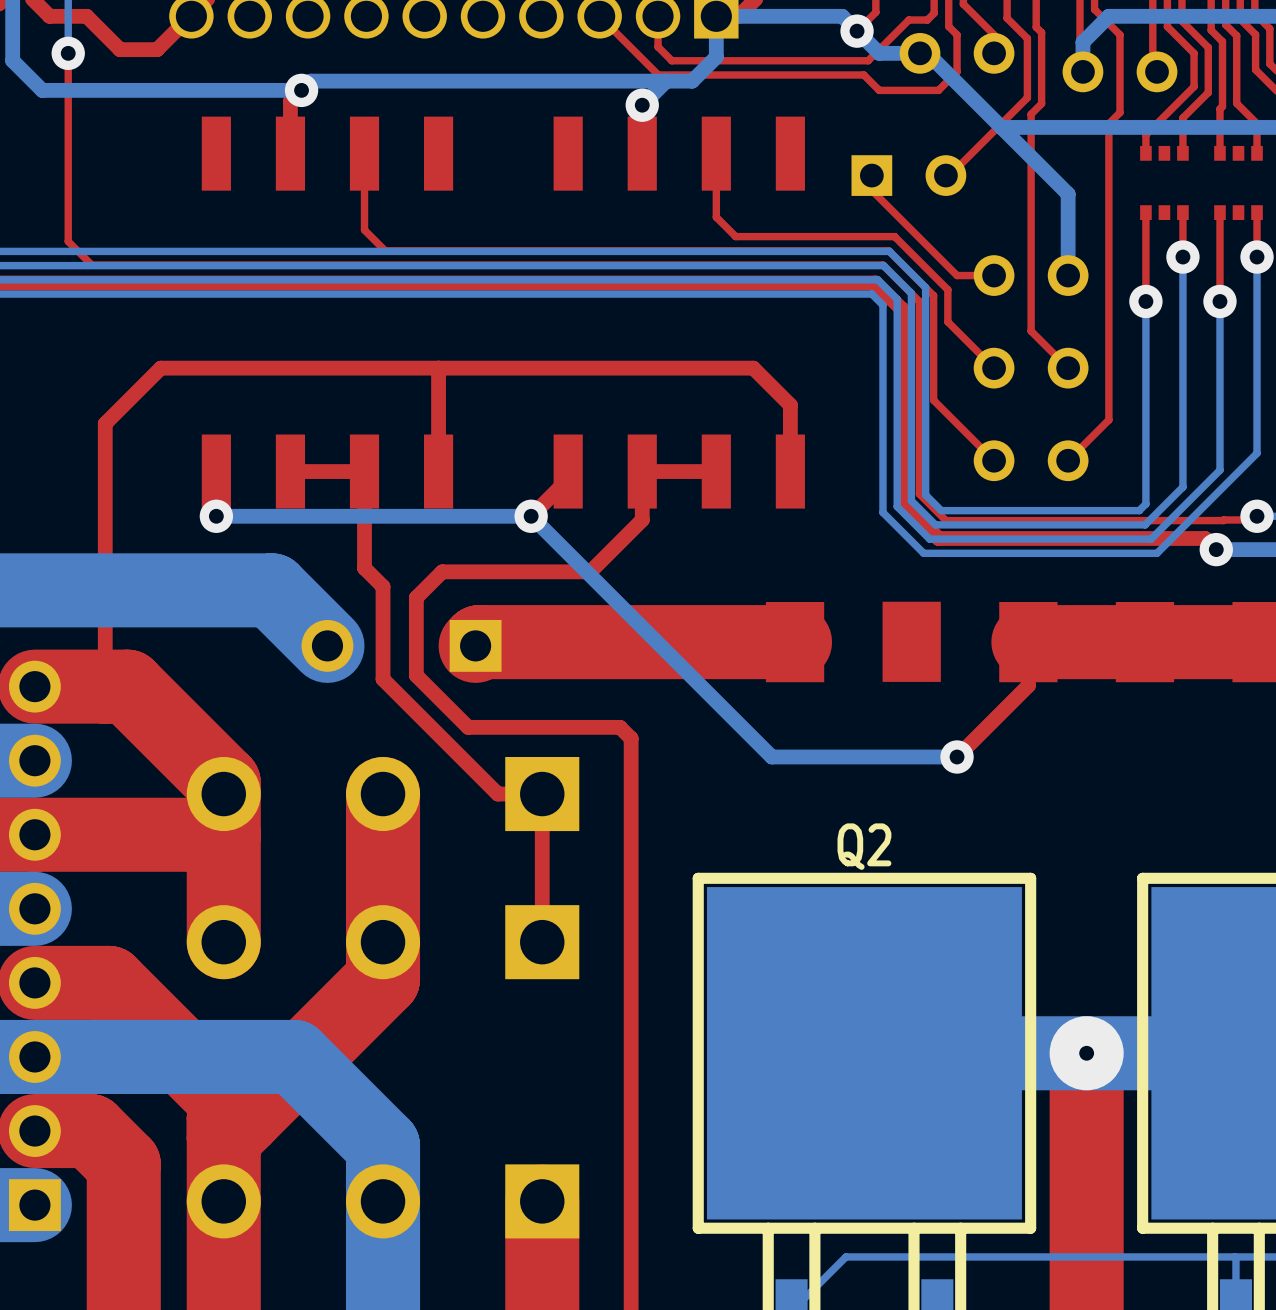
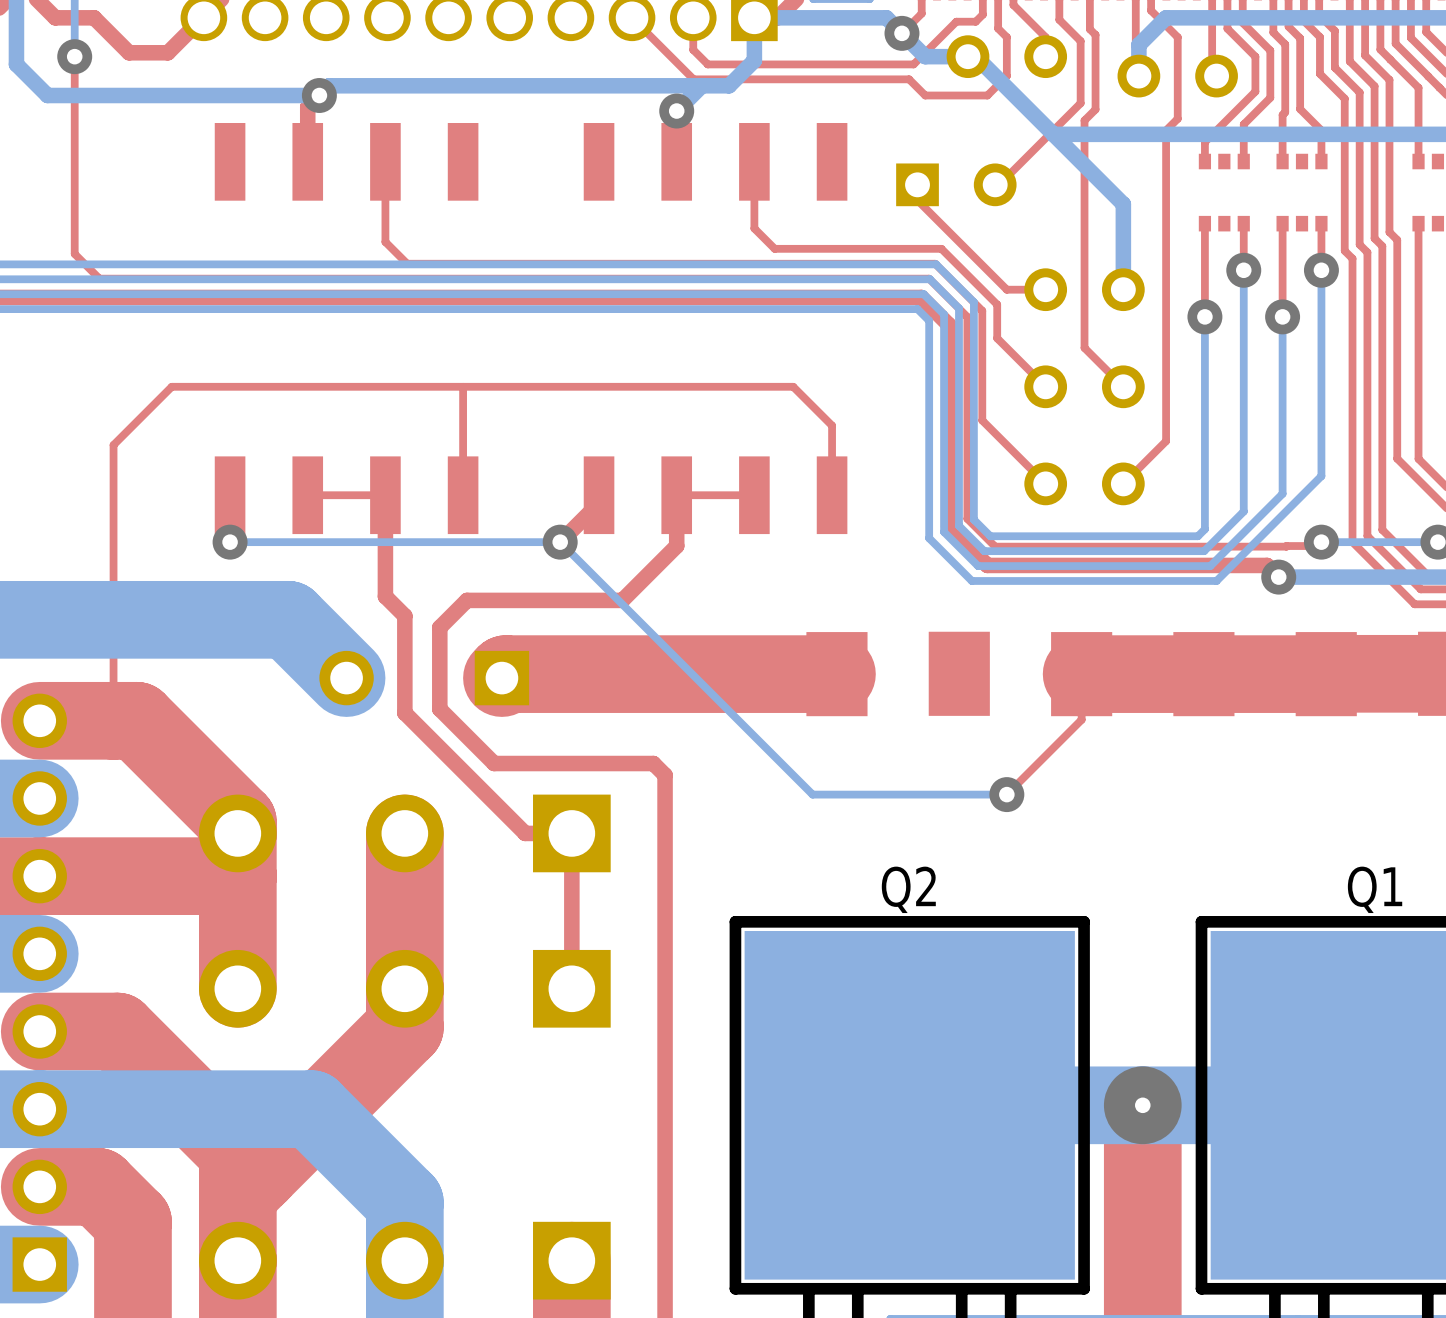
top track width: thick (438, 368) (438, 471) -> thin (463, 386) (463, 495)
top track width: thick (364, 471) (290, 471) -> thin (385, 495) (307, 495)
top track width: thick (716, 471) (642, 471) -> thin (754, 495) (676, 495)
top track width: thick (790, 471) (790, 405) (753, 368) (160, 368) (105, 423) (105, 686) -> thin (832, 495) (832, 425) (793, 386) (171, 386) (113, 445) (113, 720)
bottom track width: thick (216, 516) (531, 516) (771, 756) (957, 756) -> thin (230, 542) (560, 542) (812, 794) (1006, 794)
top track width: thick (1028, 642) (1028, 685) (957, 756) -> thin (1081, 674) (1081, 719) (1006, 794)

